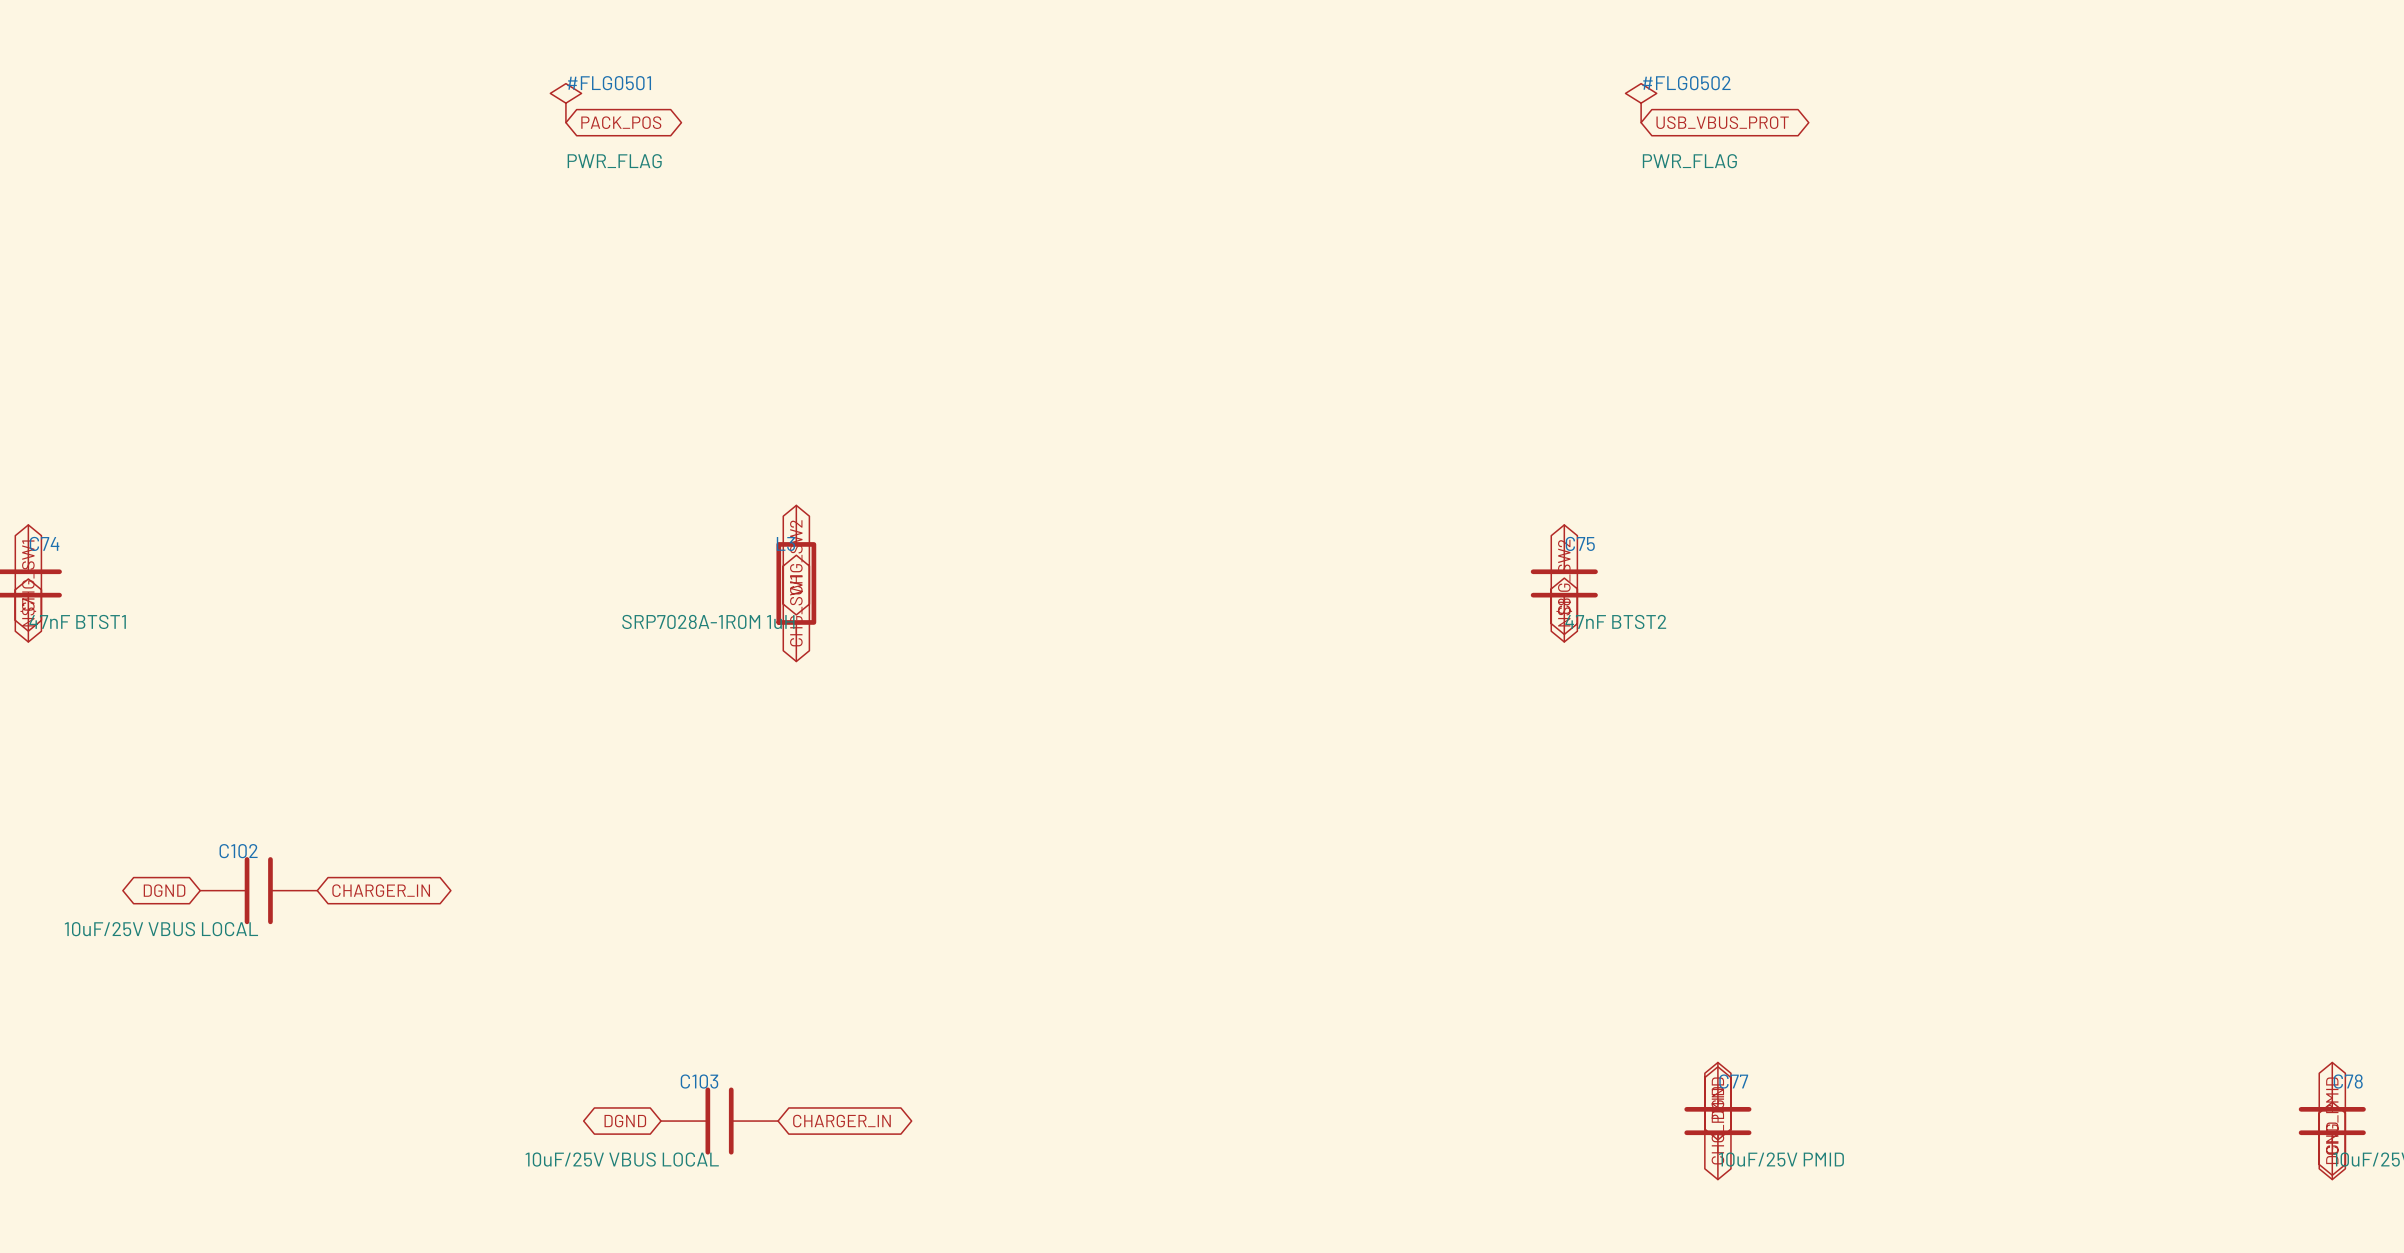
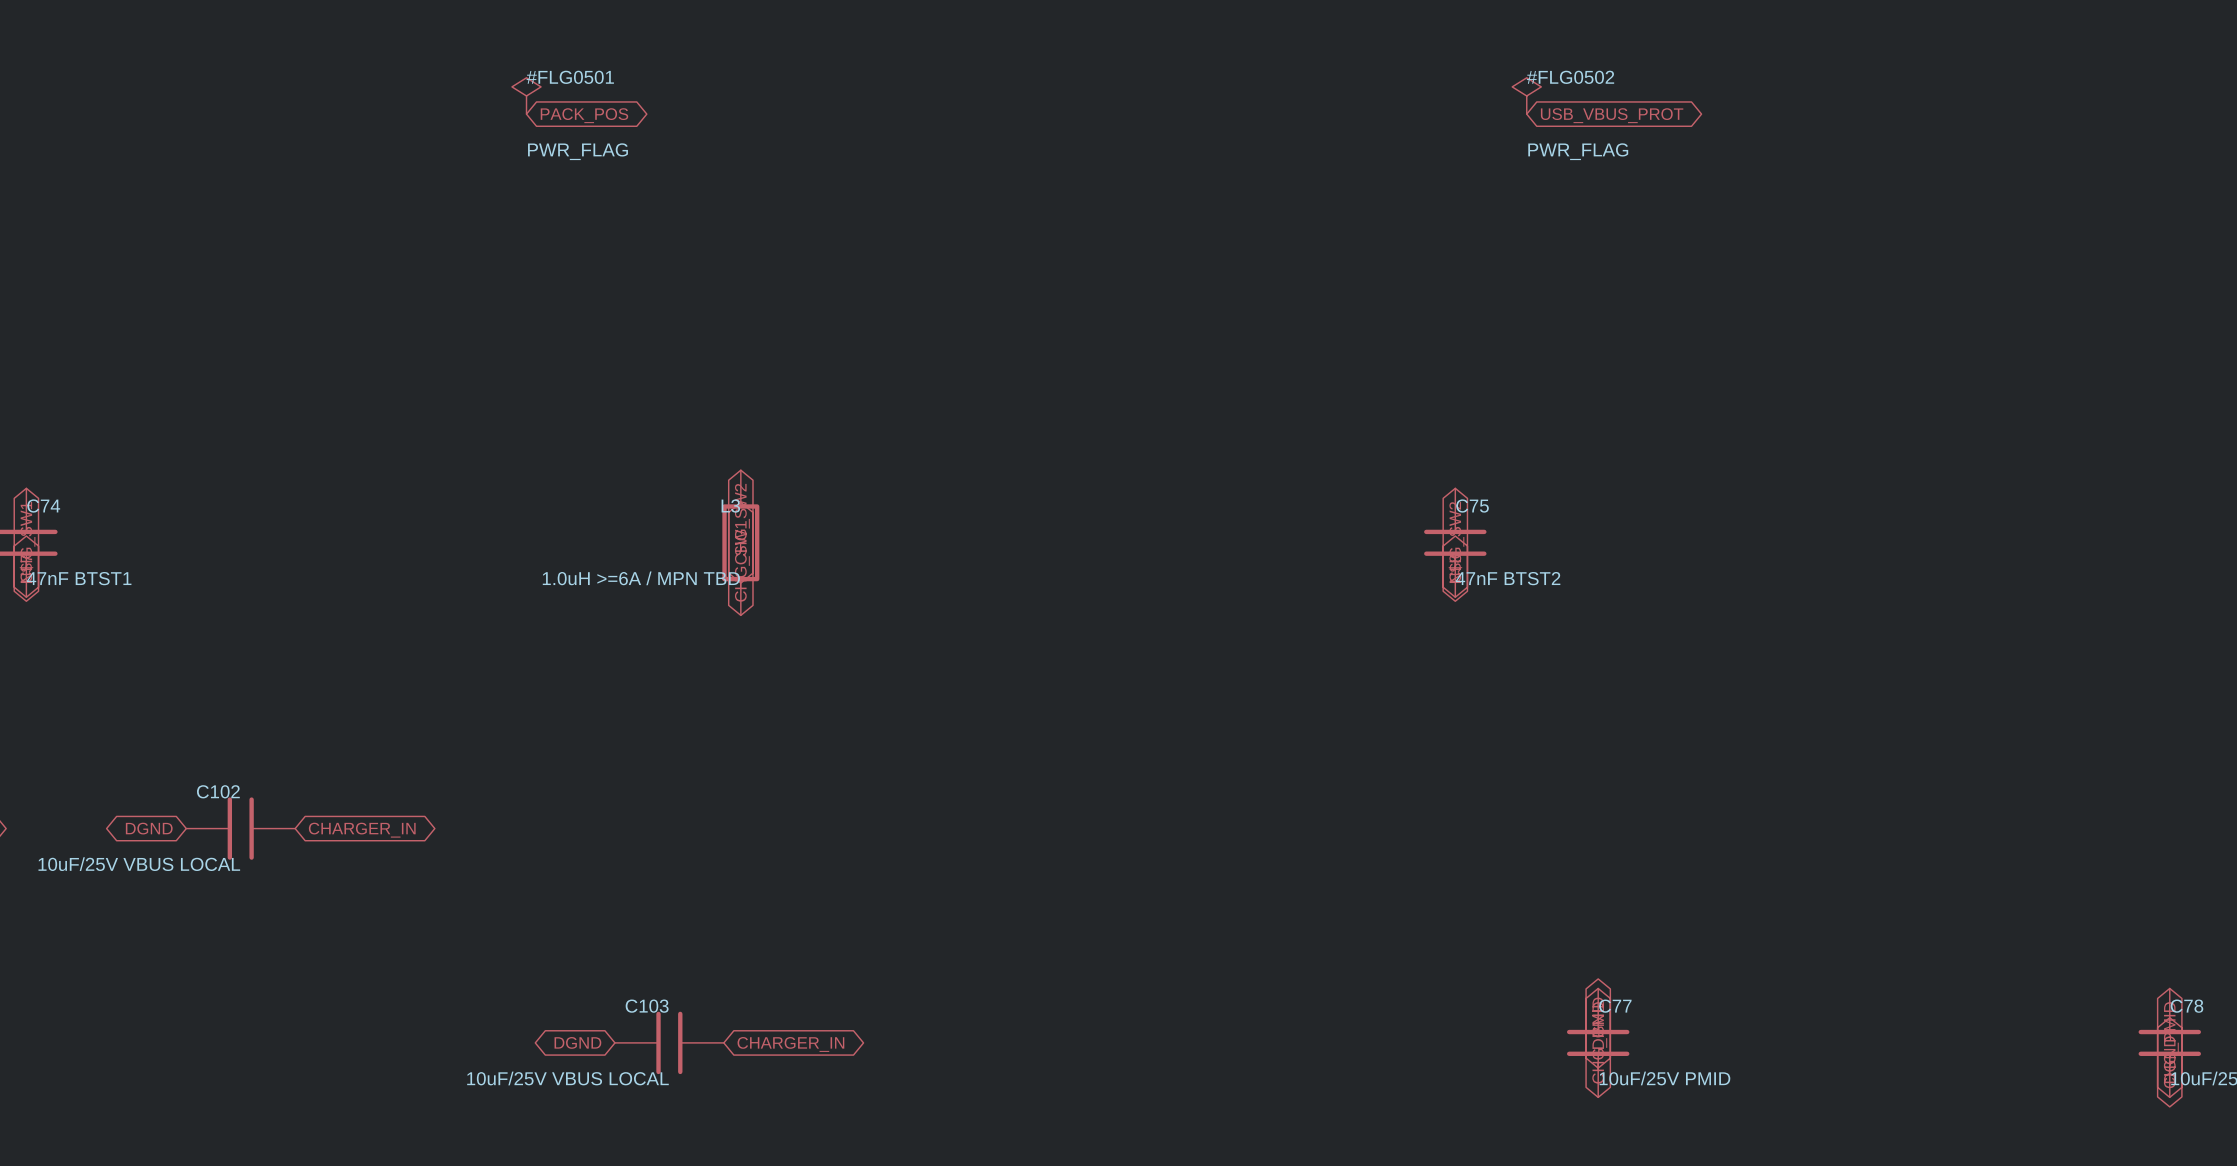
L3 value: SRP7028A-1R0M 1uH (708, 621) -> 1.0uH >=6A / MPN TBD (641, 578)

